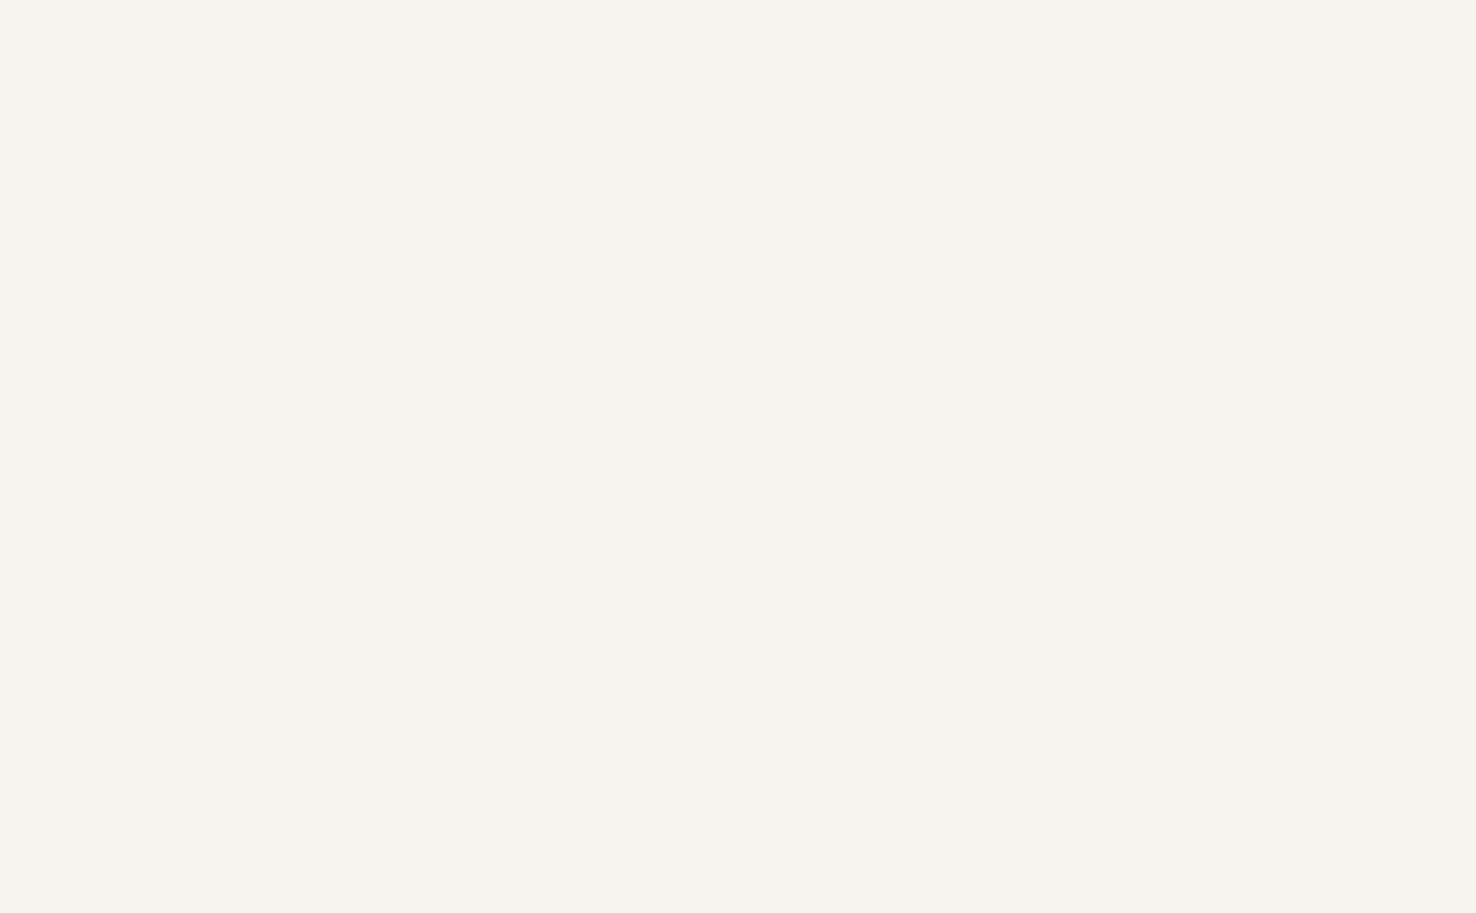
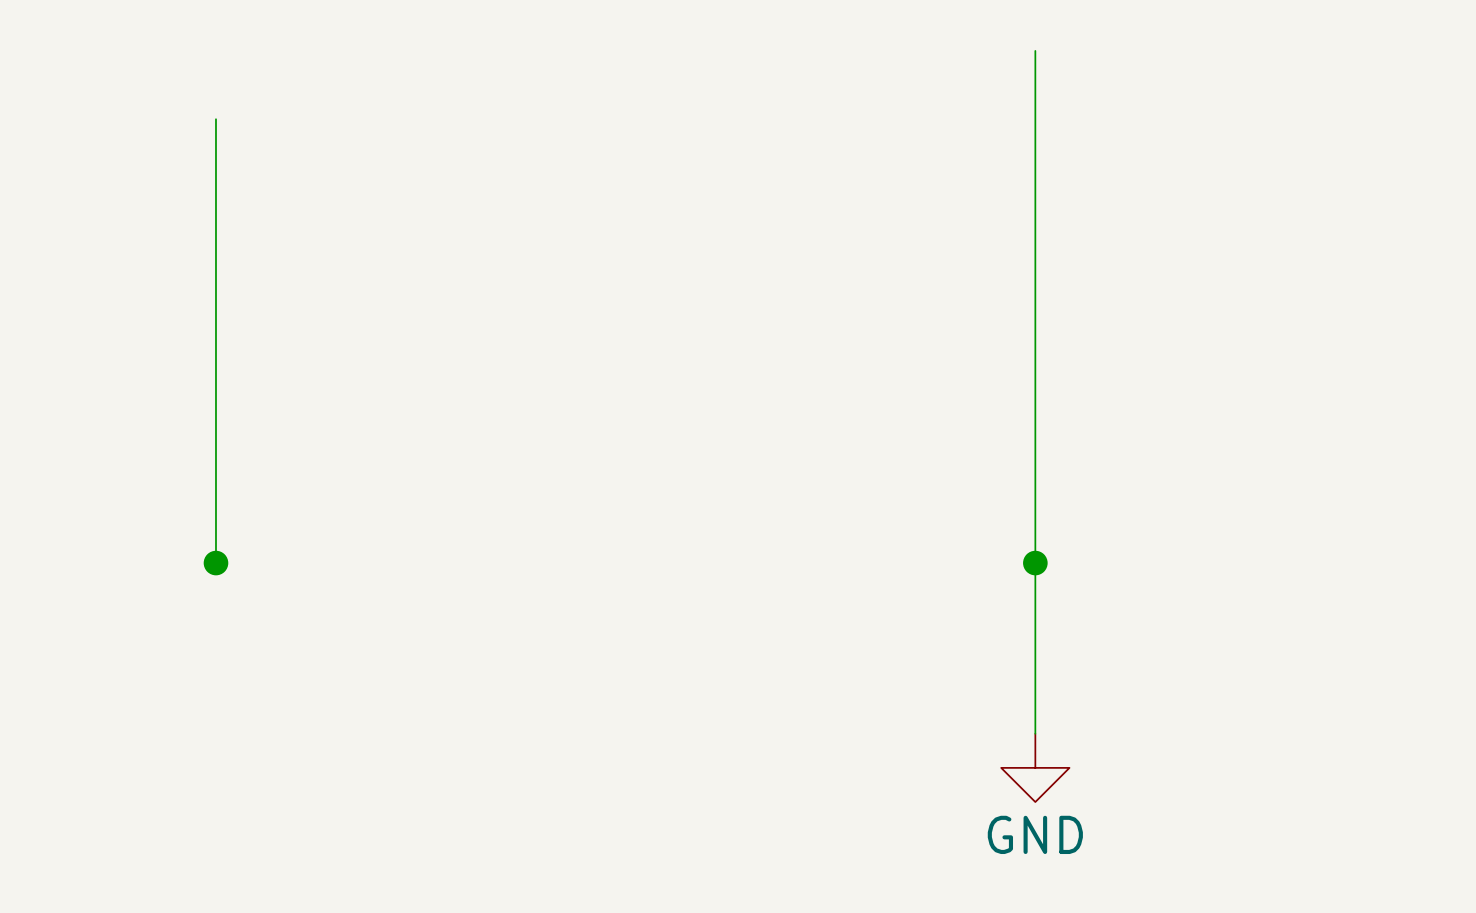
wire: none -> (1035, 50) (1035, 733)
wire: none -> (215, 119) (215, 563)
junction: none -> (215, 563)
junction: none -> (1035, 563)
power symbol: none -> GND (1035, 767)

